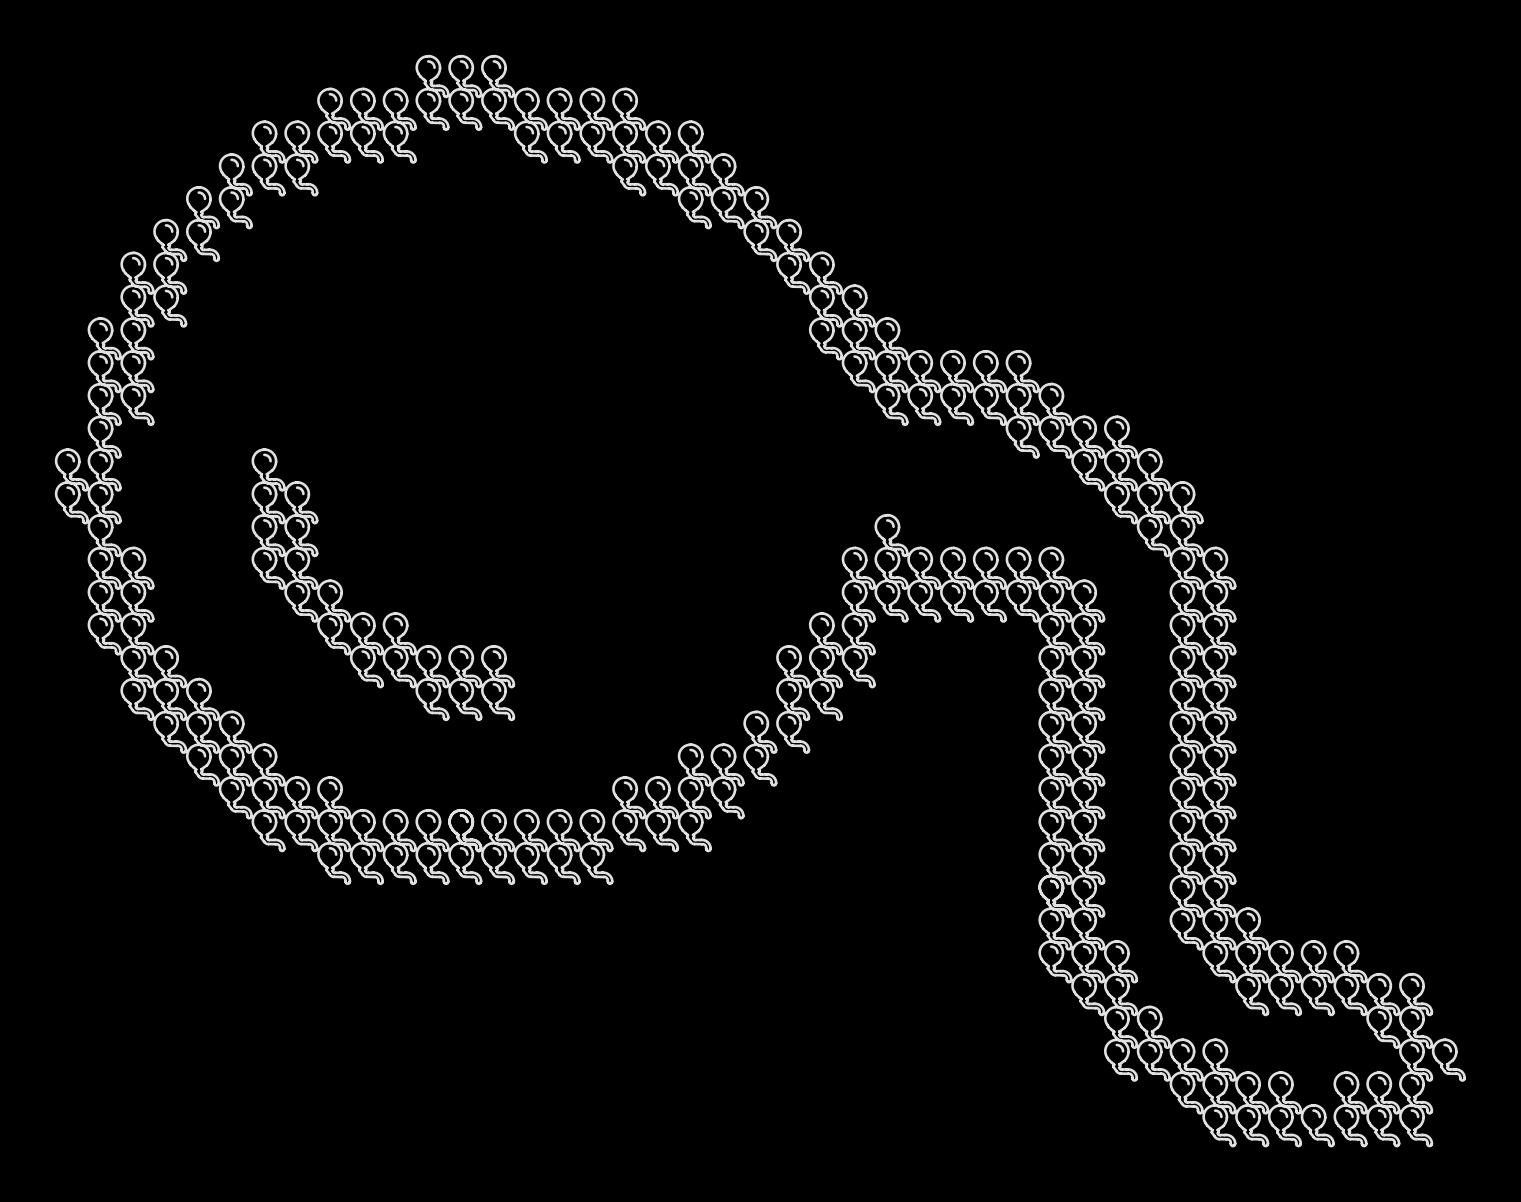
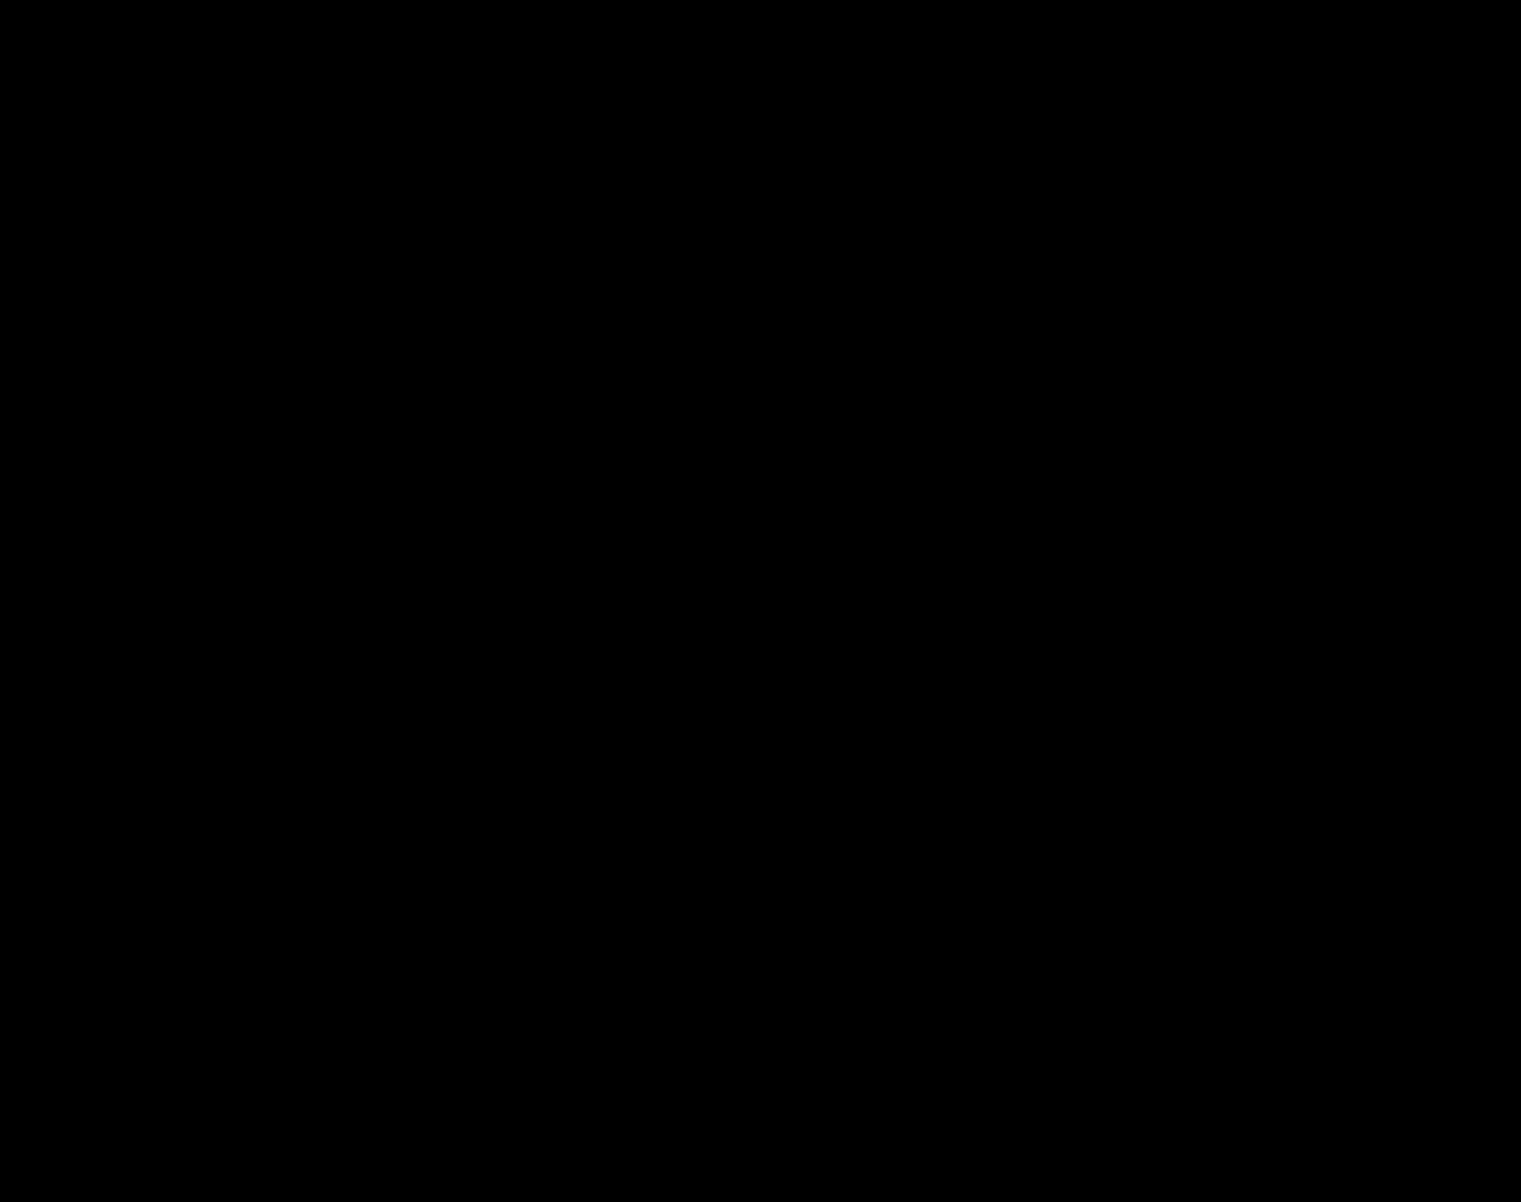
drawing: [54, 54, 1466, 1148] -> none
drawing: [251, 448, 516, 722] -> none

